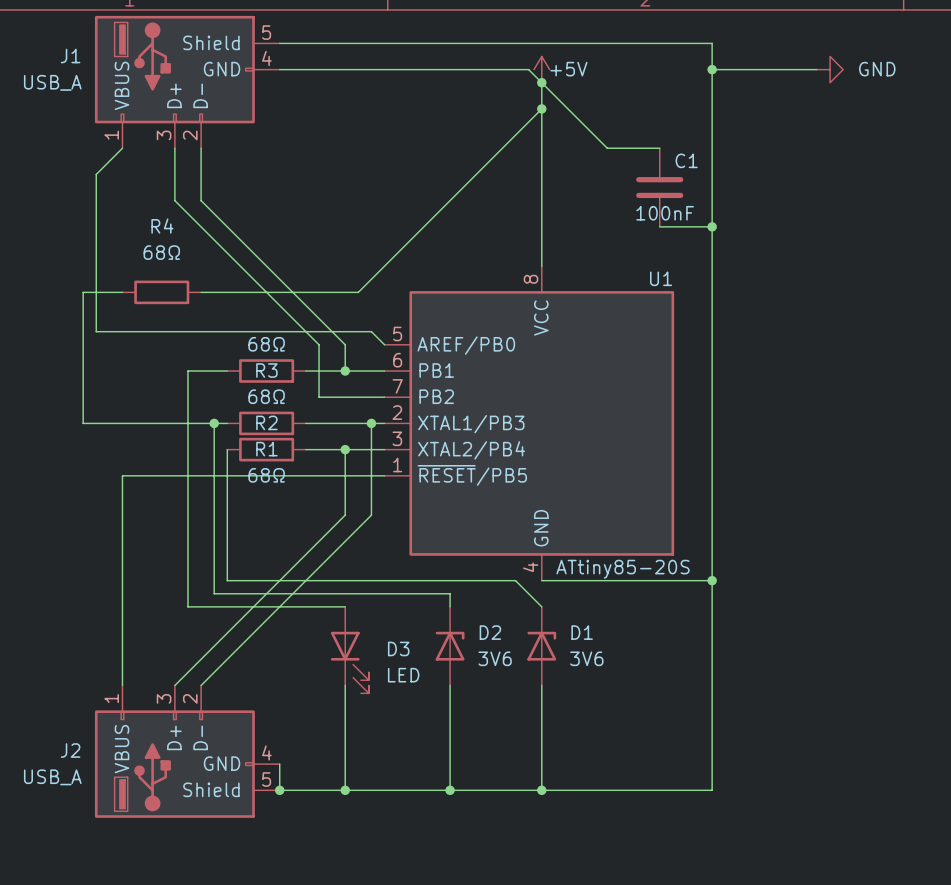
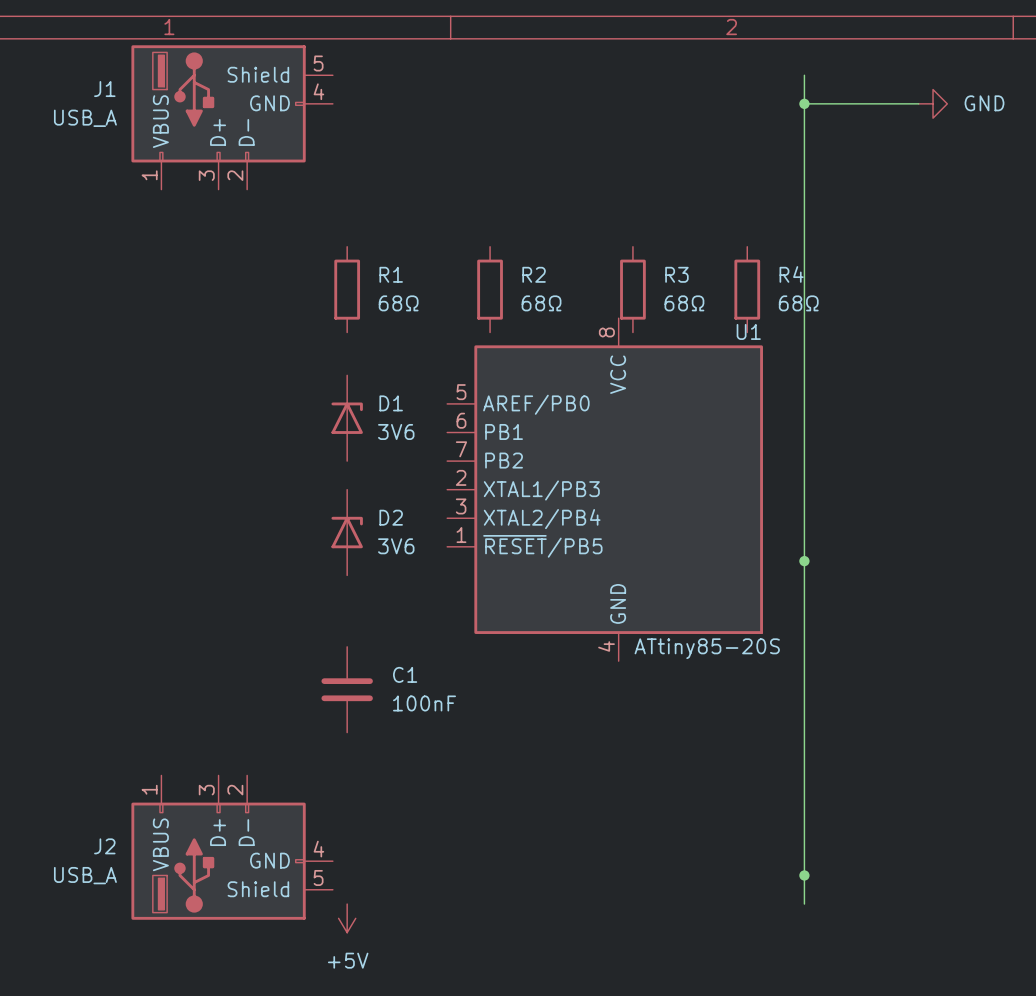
wire: (279, 43) (712, 43) -> none
wire: (279, 69) (528, 69) (607, 148) (659, 148) -> none
power symbol: +5V (541, 69) -> none
wire: (541, 82) (541, 266) -> none
junction: (541, 82) -> none
wire: (541, 108) (358, 292) (201, 292) -> none
junction: (541, 108) -> none
wire: (122, 148) (96, 174) (96, 331) (371, 331) (384, 344) -> none
wire: (174, 148) (174, 200) (319, 344) (319, 397) (384, 397) -> none
wire: (201, 148) (201, 200) (345, 344) (345, 371) -> none
C1 name position: C1 (686, 160) -> C1 (405, 674)
C1 position: (659, 187) -> (347, 689)
C1 value position: 100nF (665, 213) -> 100nF (424, 703)
R4 name position: R4 (162, 226) -> R4 (791, 274)
wire: (659, 226) (712, 226) -> none
junction: (712, 226) -> none
wire: (122, 292) (83, 292) (83, 423) (227, 423) -> none
R4 rotation: 0° (161, 292) -> 90° clockwise (747, 289)
R4 position: (161, 292) -> (747, 289)
R3 value position: 68Ω (266, 344) -> 68Ω (684, 303)
R3 name position: R3 (266, 370) -> R3 (676, 274)
wire: (227, 371) (187, 371) (187, 606) (345, 606) -> none
R3 rotation: 0° (266, 371) -> 90° clockwise (632, 289)
R3 position: (266, 371) -> (632, 289)
wire: (305, 371) (384, 371) -> none
junction: (345, 371) -> none
R2 value position: 68Ω (266, 396) -> 68Ω (541, 303)
R2 name position: R2 (266, 422) -> R2 (534, 274)
wire: (214, 423) (214, 593) (450, 593) (450, 606) -> none
junction: (214, 423) -> none
R2 rotation: 0° (266, 423) -> 90° clockwise (490, 289)
R2 position: (266, 423) -> (490, 289)
wire: (305, 423) (384, 423) -> none
wire: (371, 423) (371, 515) (201, 685) -> none
junction: (371, 423) -> none
wire: (227, 449) (227, 580) (515, 580) (541, 606) -> none
R1 rotation: 0° (266, 449) -> 90° clockwise (347, 289)
R1 position: (266, 449) -> (347, 289)
R1 name position: R1 (266, 449) -> R1 (391, 274)
wire: (305, 449) (384, 449) -> none
wire: (345, 449) (345, 515) (174, 685) -> none
junction: (345, 449) -> none
R1 value position: 68Ω (266, 475) -> 68Ω (398, 303)
wire: (384, 475) (122, 475) (122, 685) -> none
junction: none -> (804, 561)
wire: (541, 580) (712, 580) -> none
junction: (712, 580) -> none
D2 position: (450, 646) -> (347, 532)
D1 position: (541, 646) -> (347, 418)
D3: LED (349, 650) -> none
wire: (345, 685) (345, 790) -> none
wire: (450, 685) (450, 790) -> none
wire: (541, 685) (541, 790) -> none
wire: (279, 764) (279, 790) (712, 790) -> (804, 904) (804, 889)
junction: none -> (804, 875)
junction: (279, 790) -> none
junction: (345, 790) -> none
junction: (450, 790) -> none
junction: (541, 790) -> none
power symbol: none -> +5V (347, 918)

